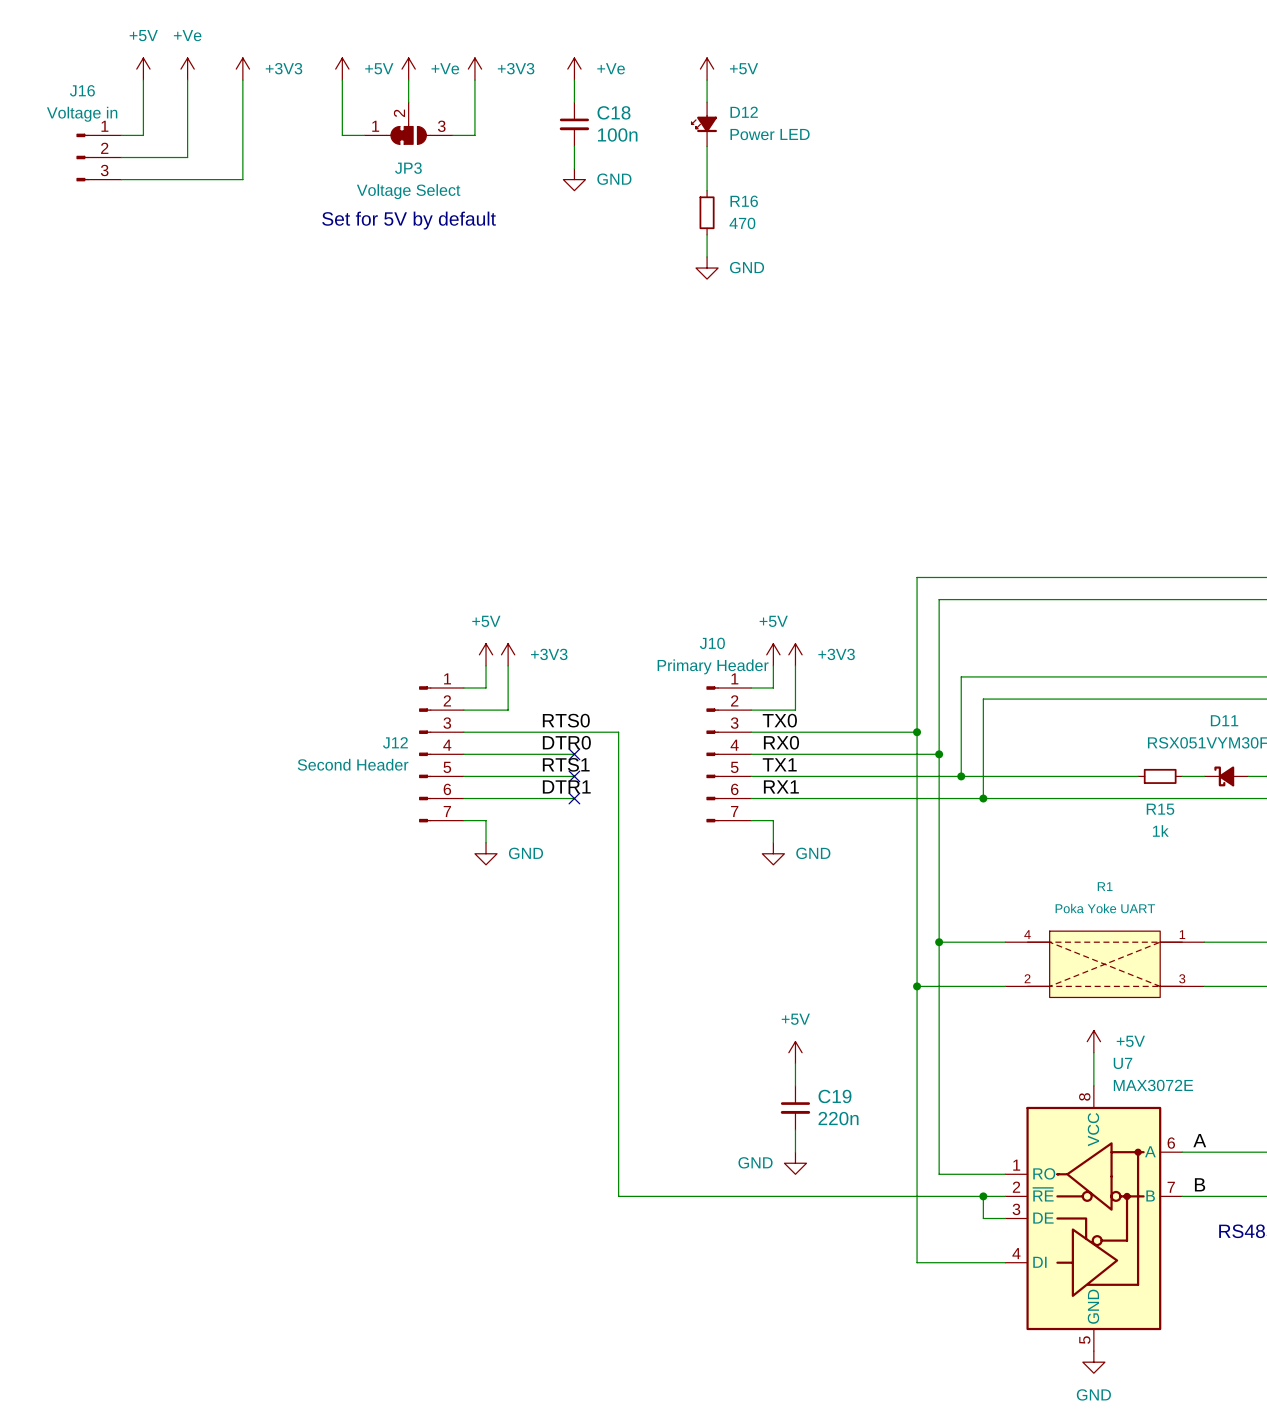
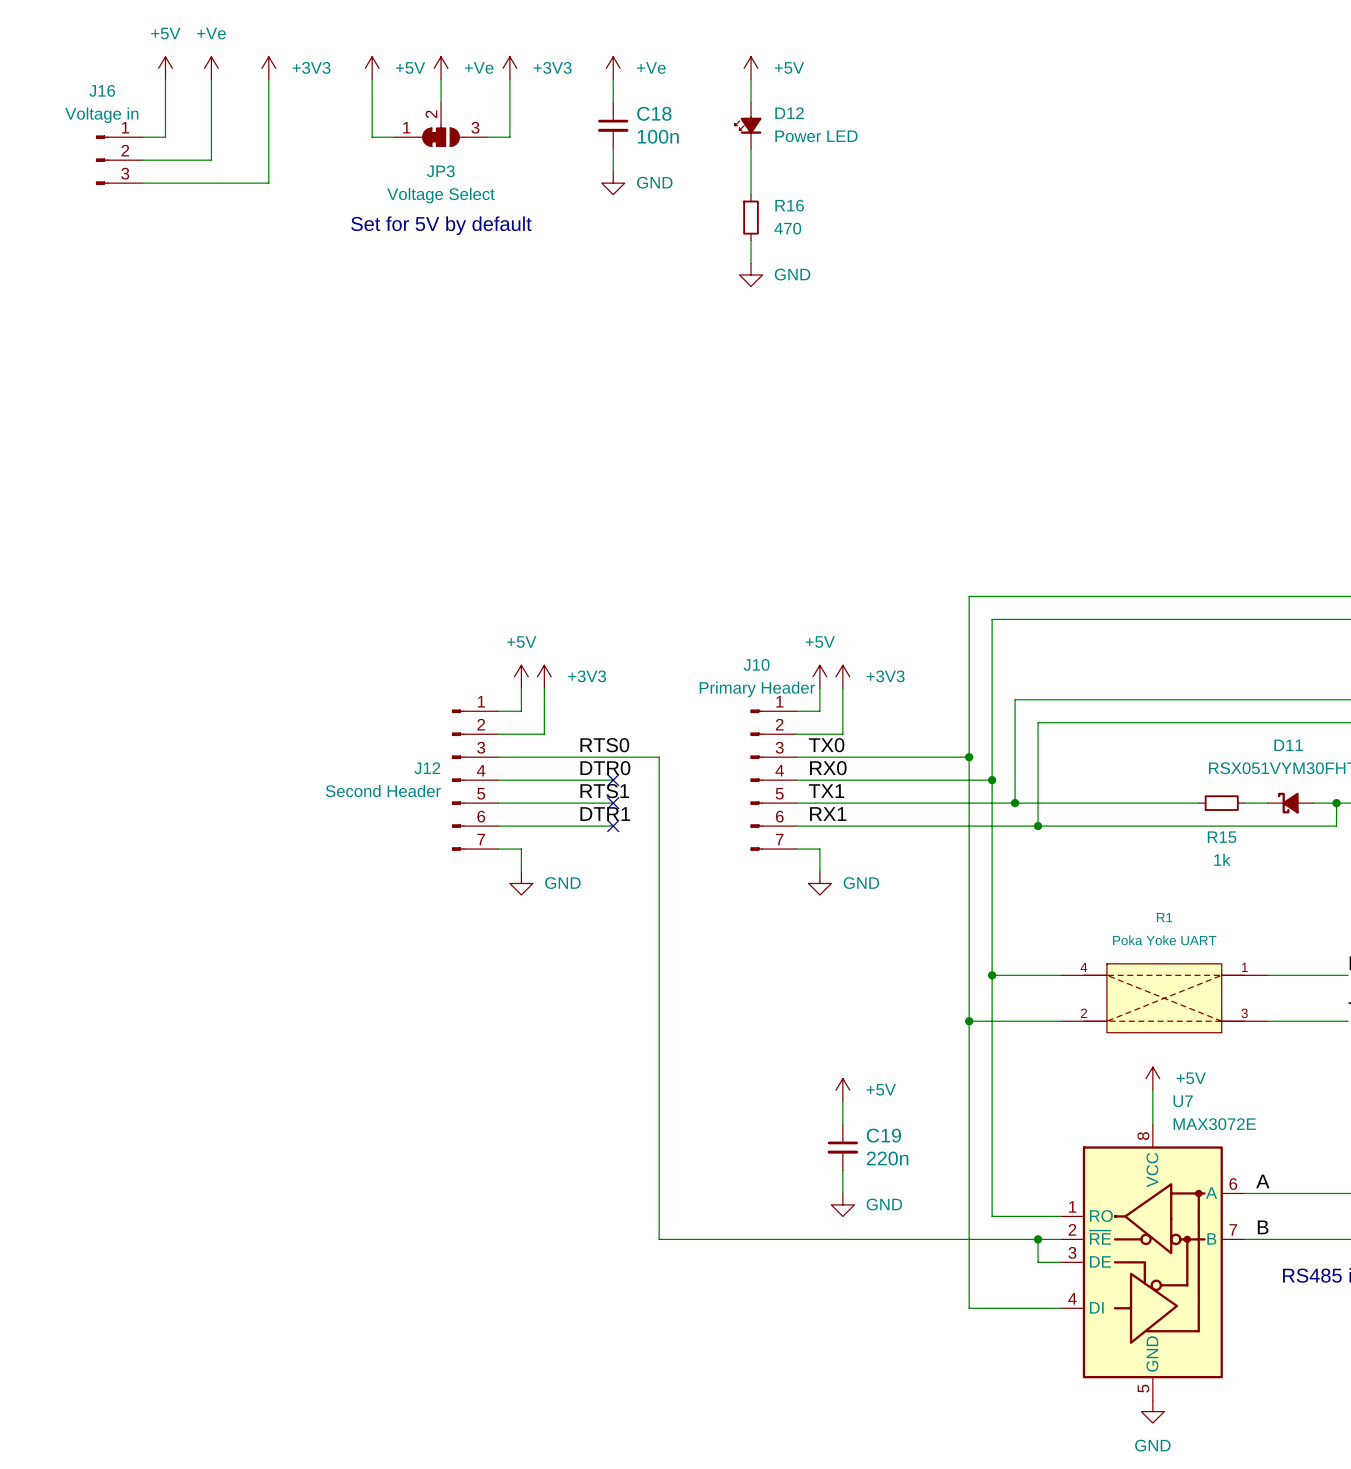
power symbol text position: +5V (795, 1019) -> +5V (881, 1089)
power symbol text position: GND (755, 1162) -> GND (884, 1204)

